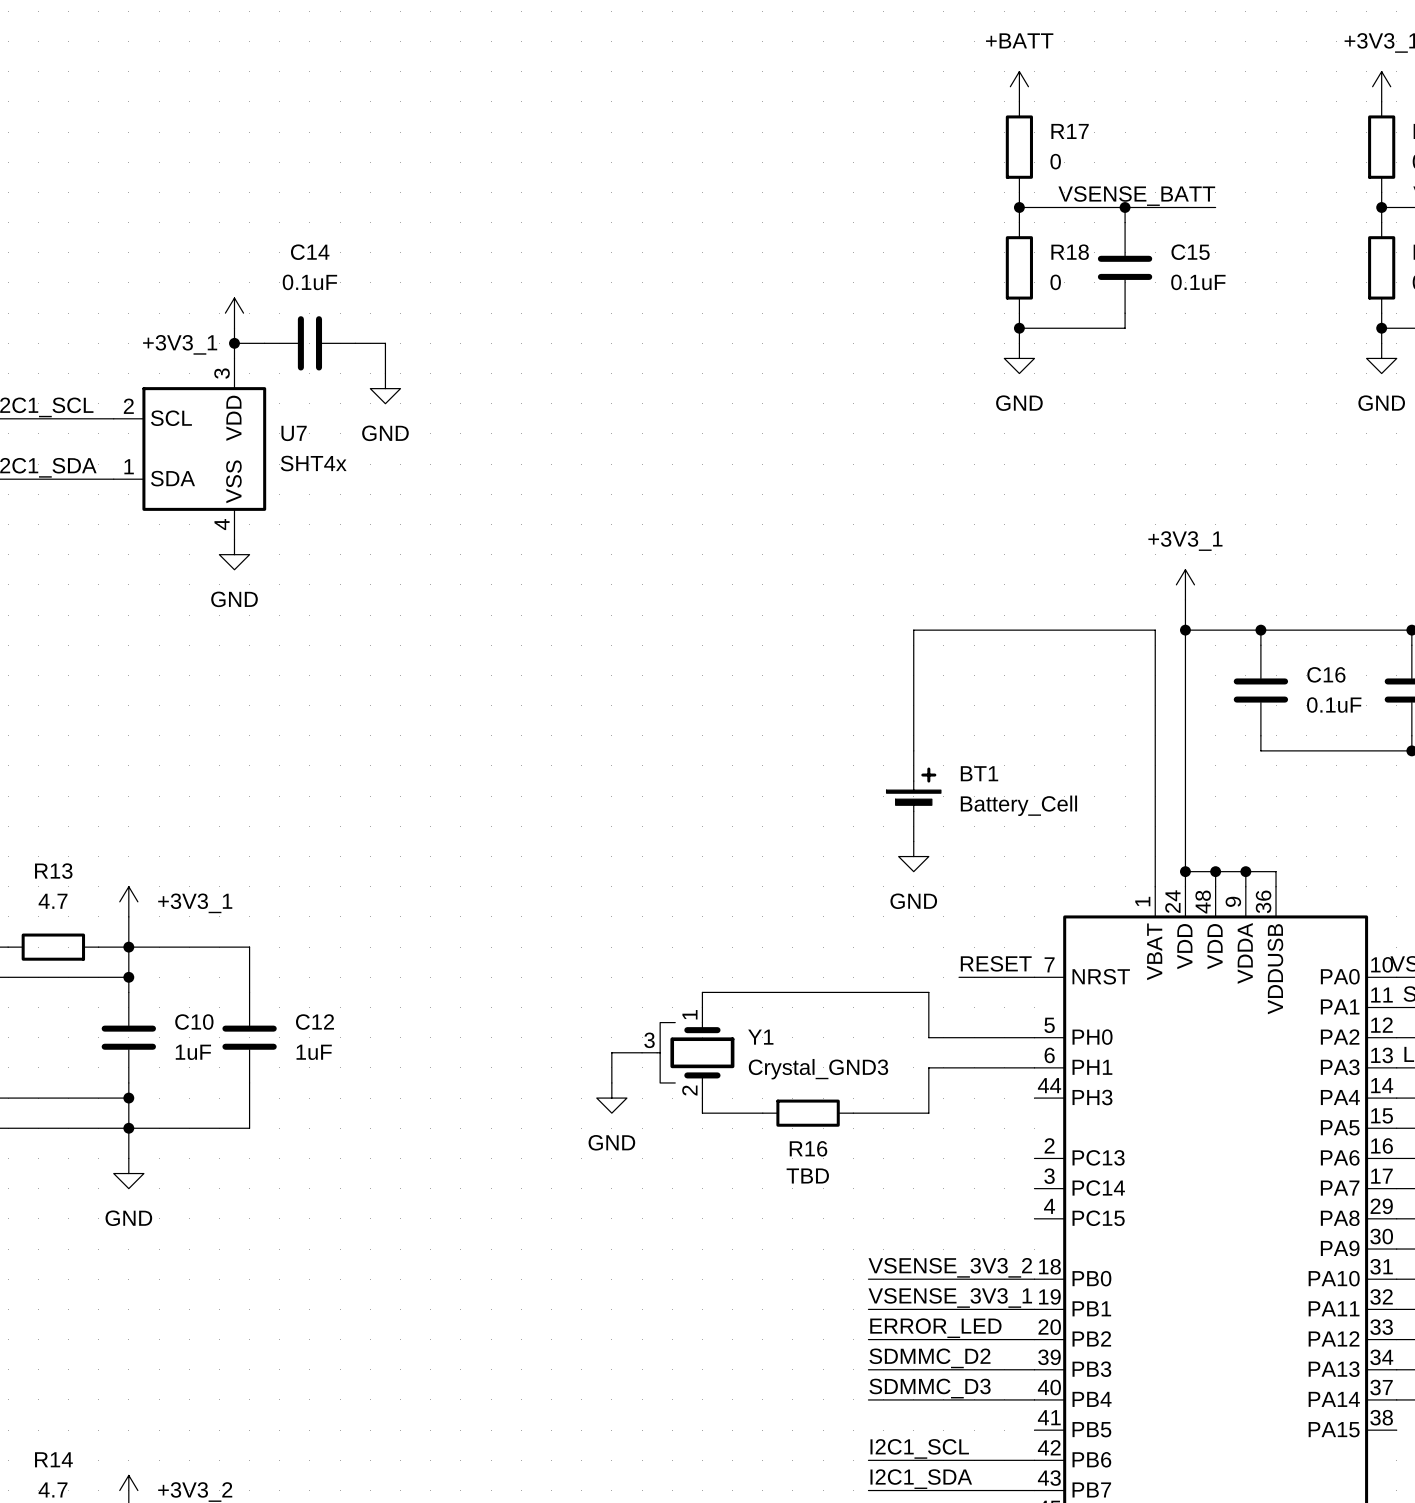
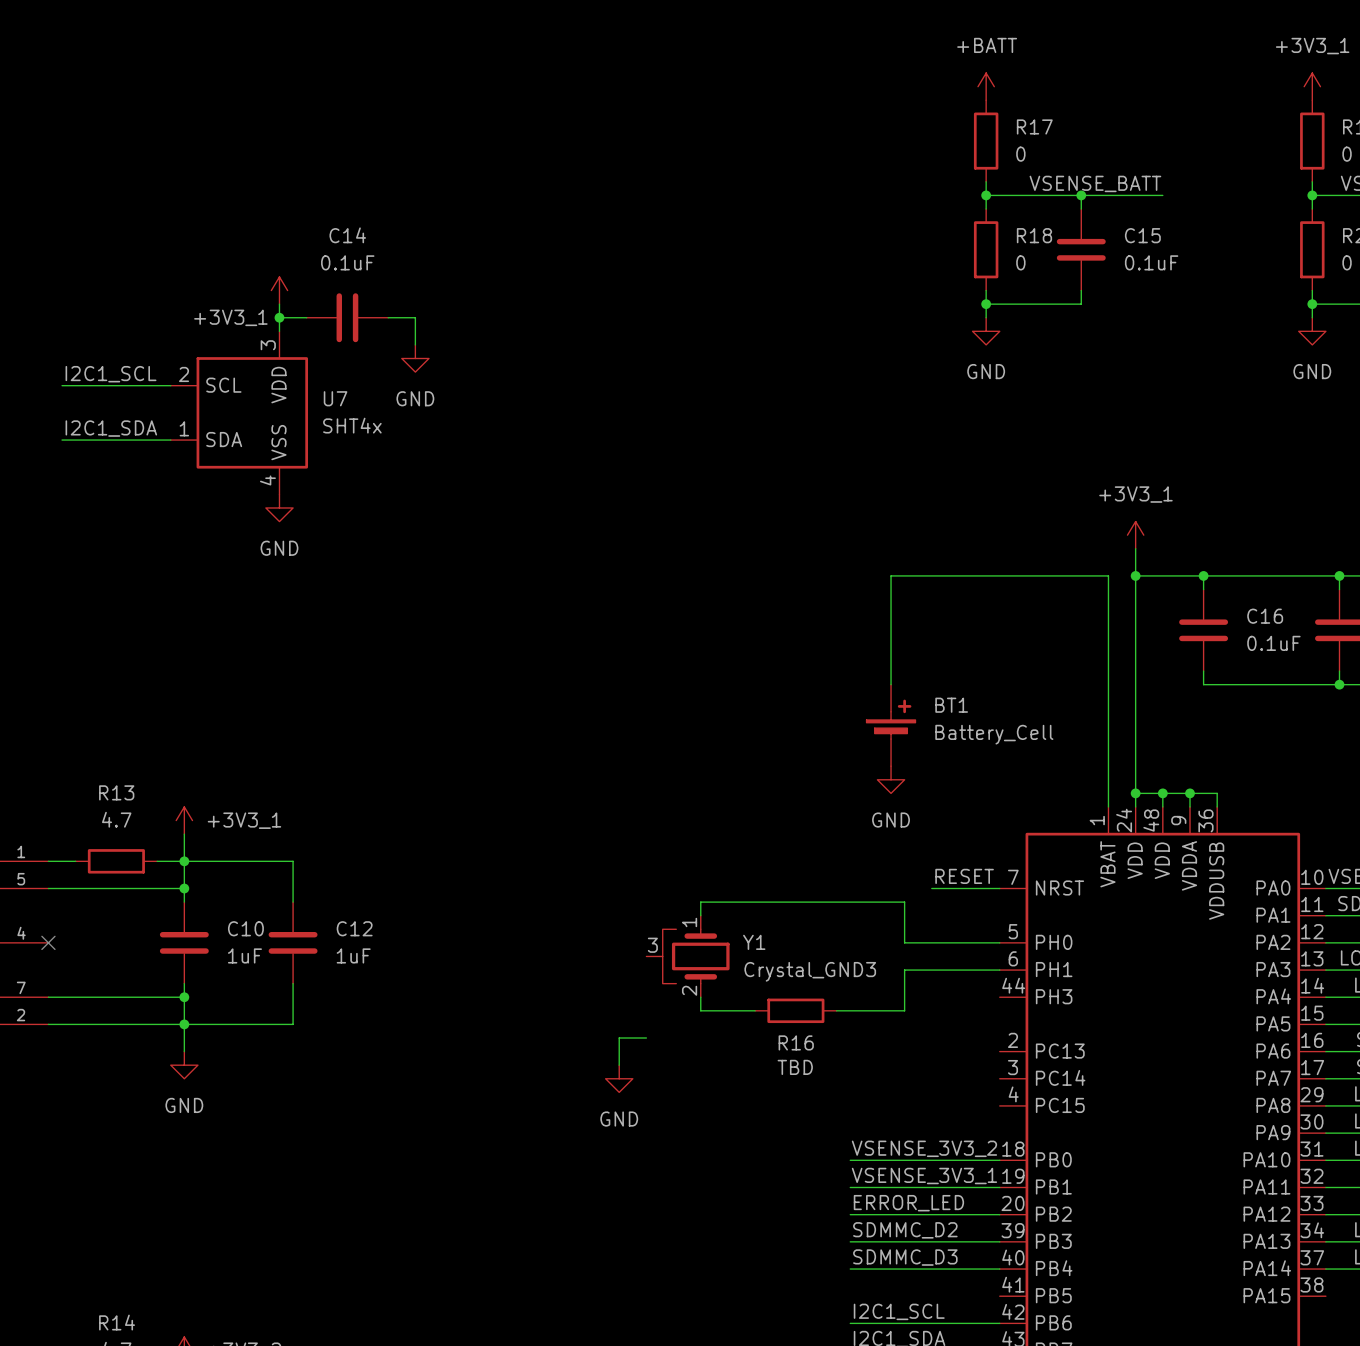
wire: (642, 1052) (611, 1052) (611, 1082) -> (646, 1038) (619, 1038) (619, 1065)
power symbol position: GND (611, 1098) -> GND (619, 1078)

